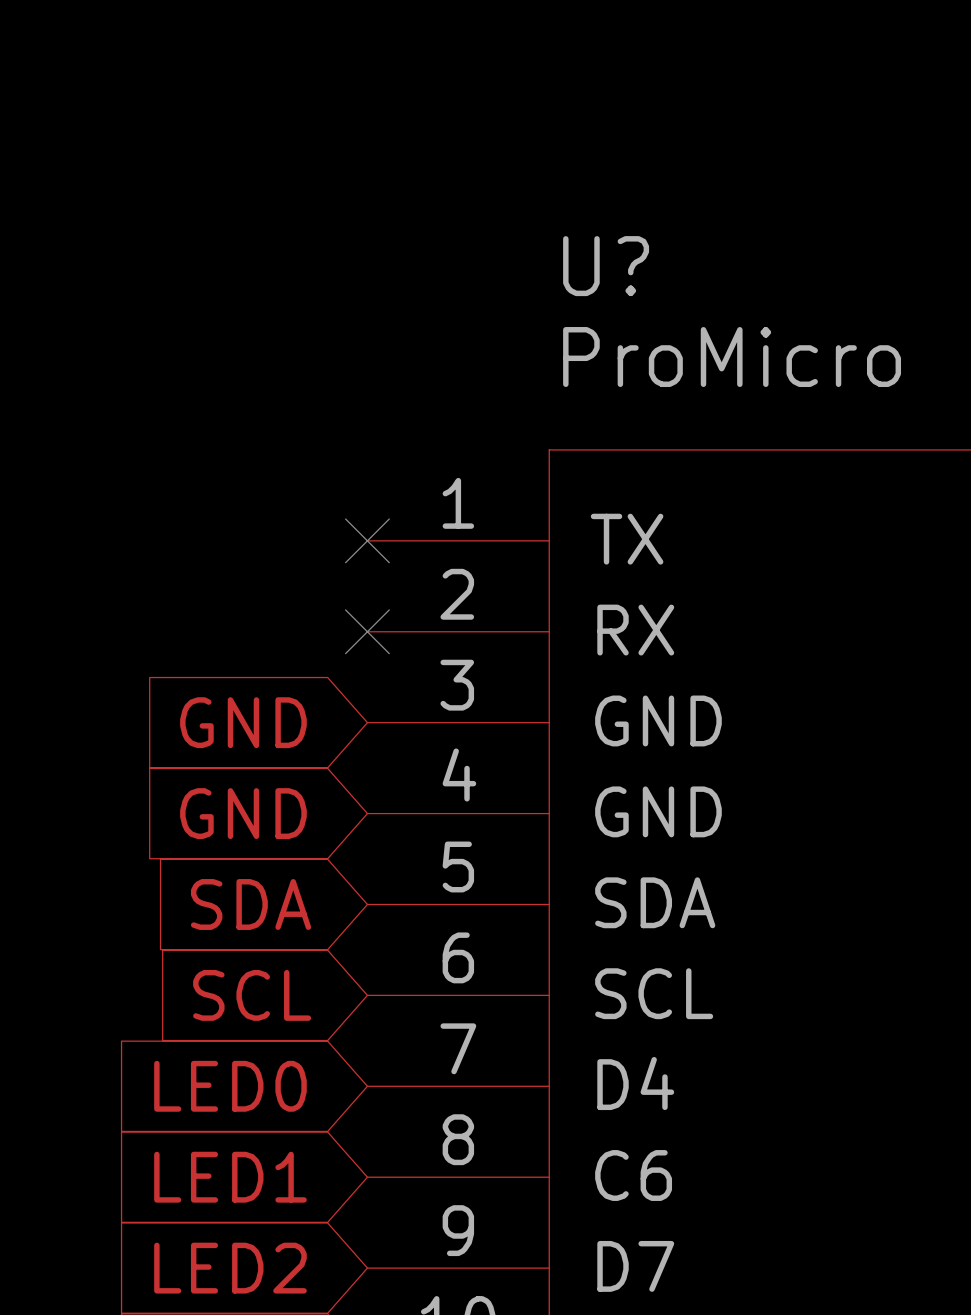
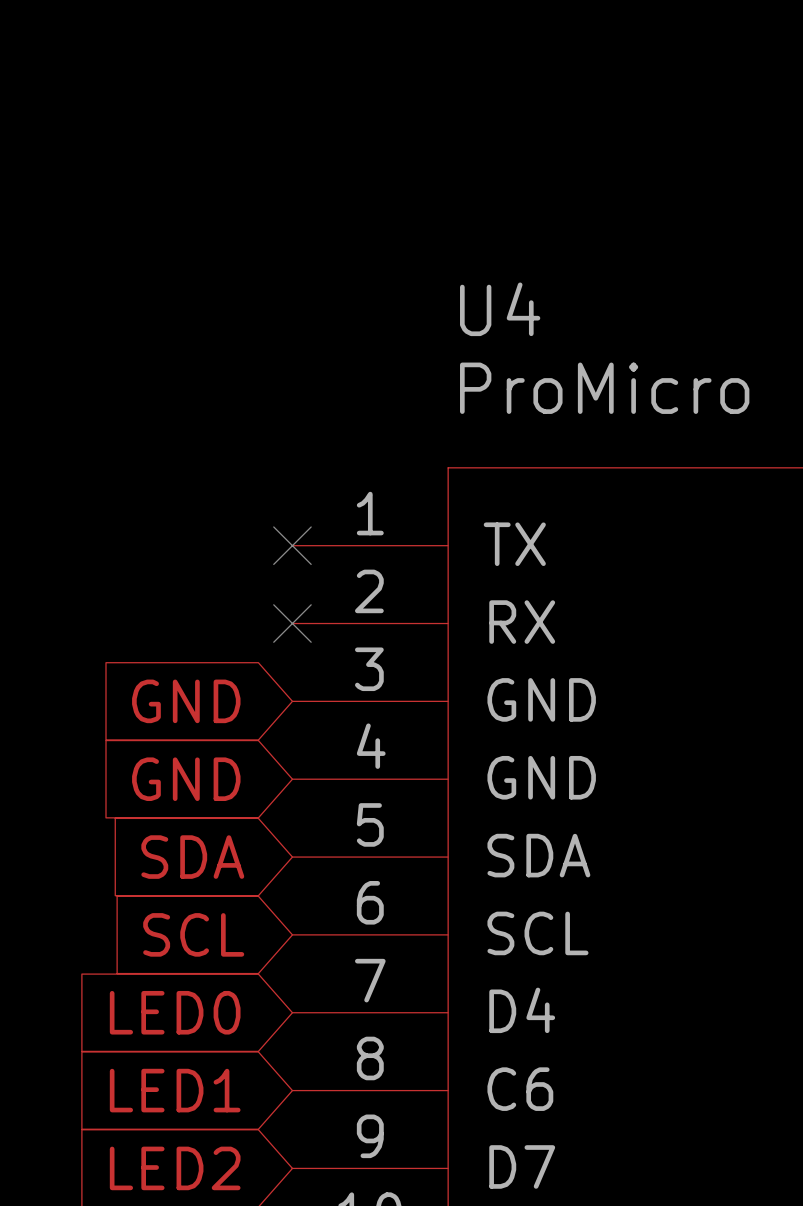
U? name: U? (606, 266) -> U4 (500, 309)

